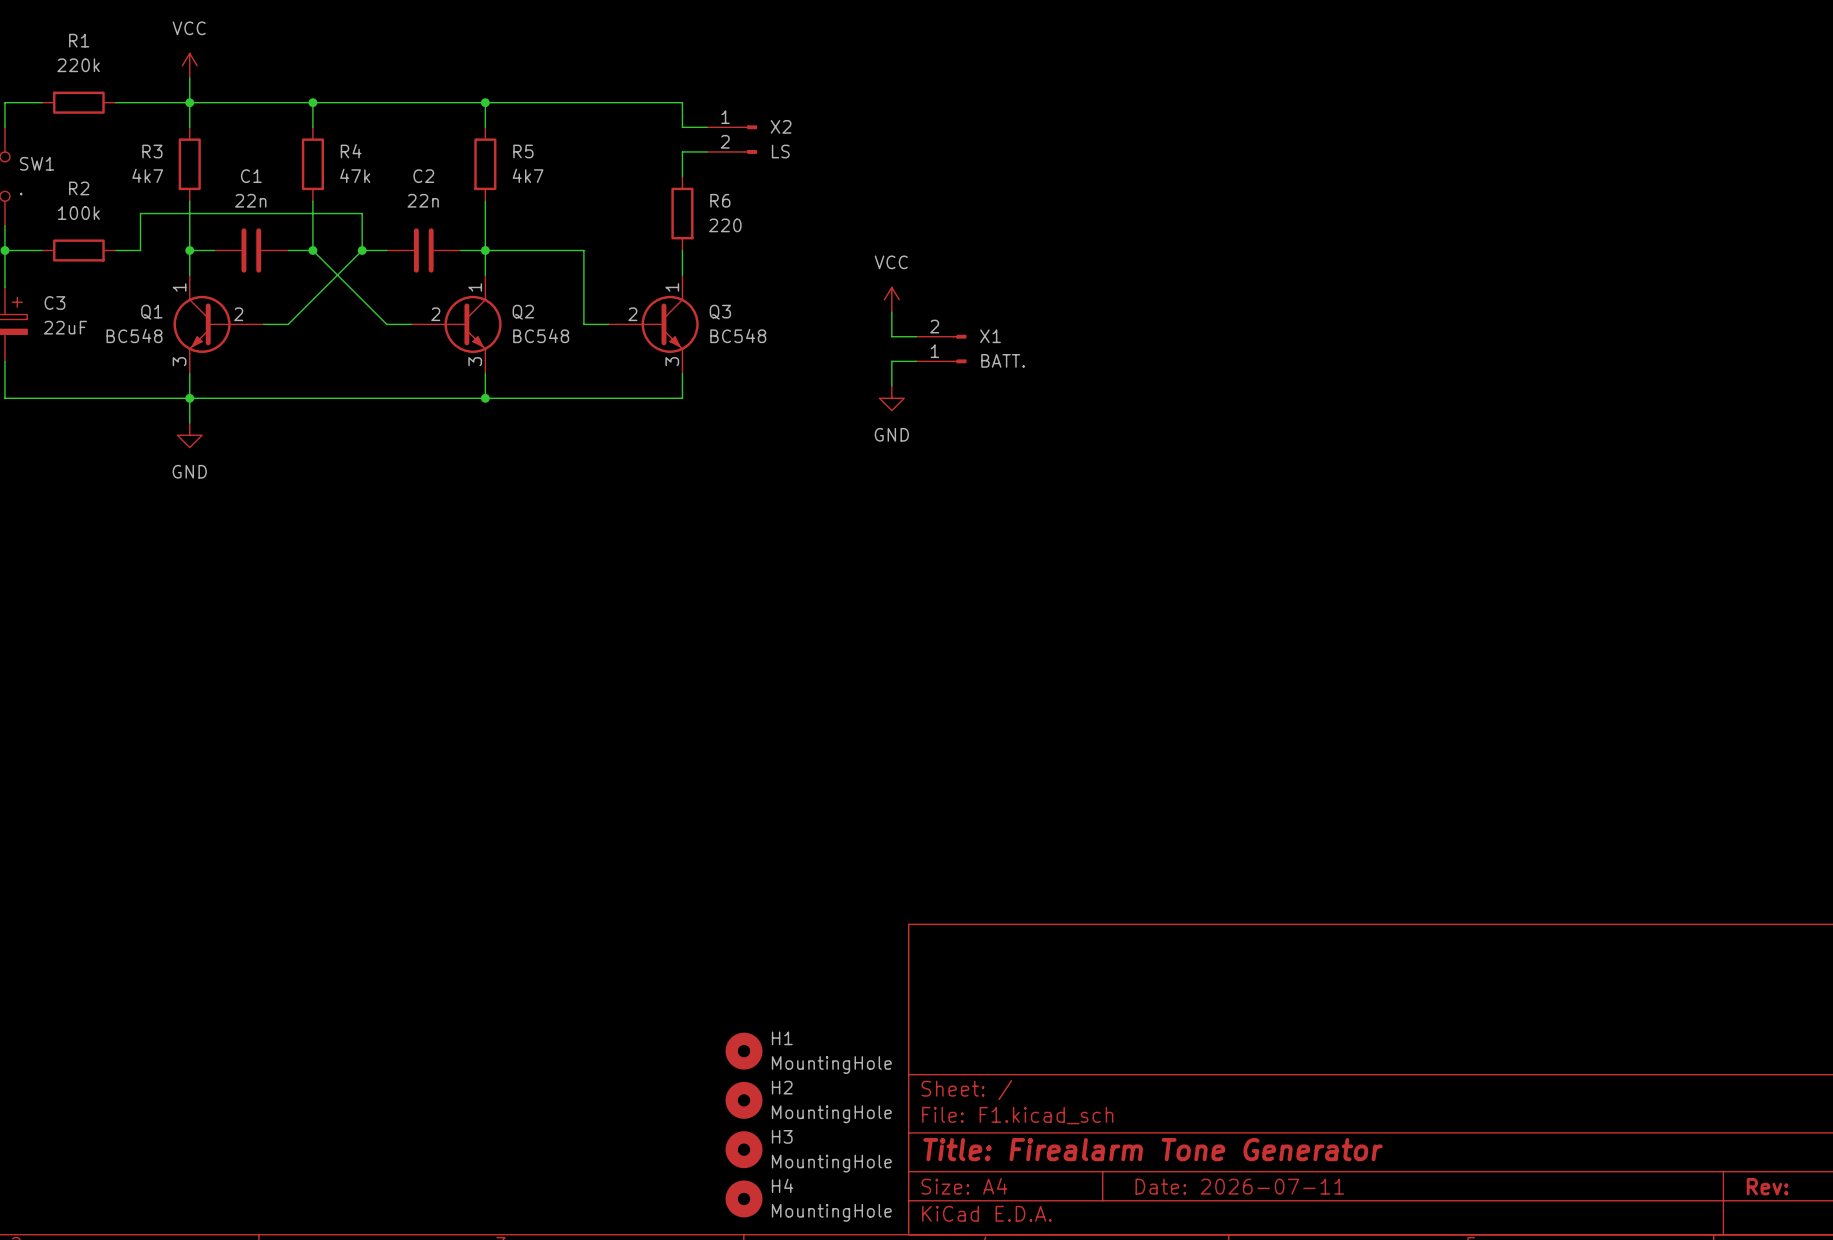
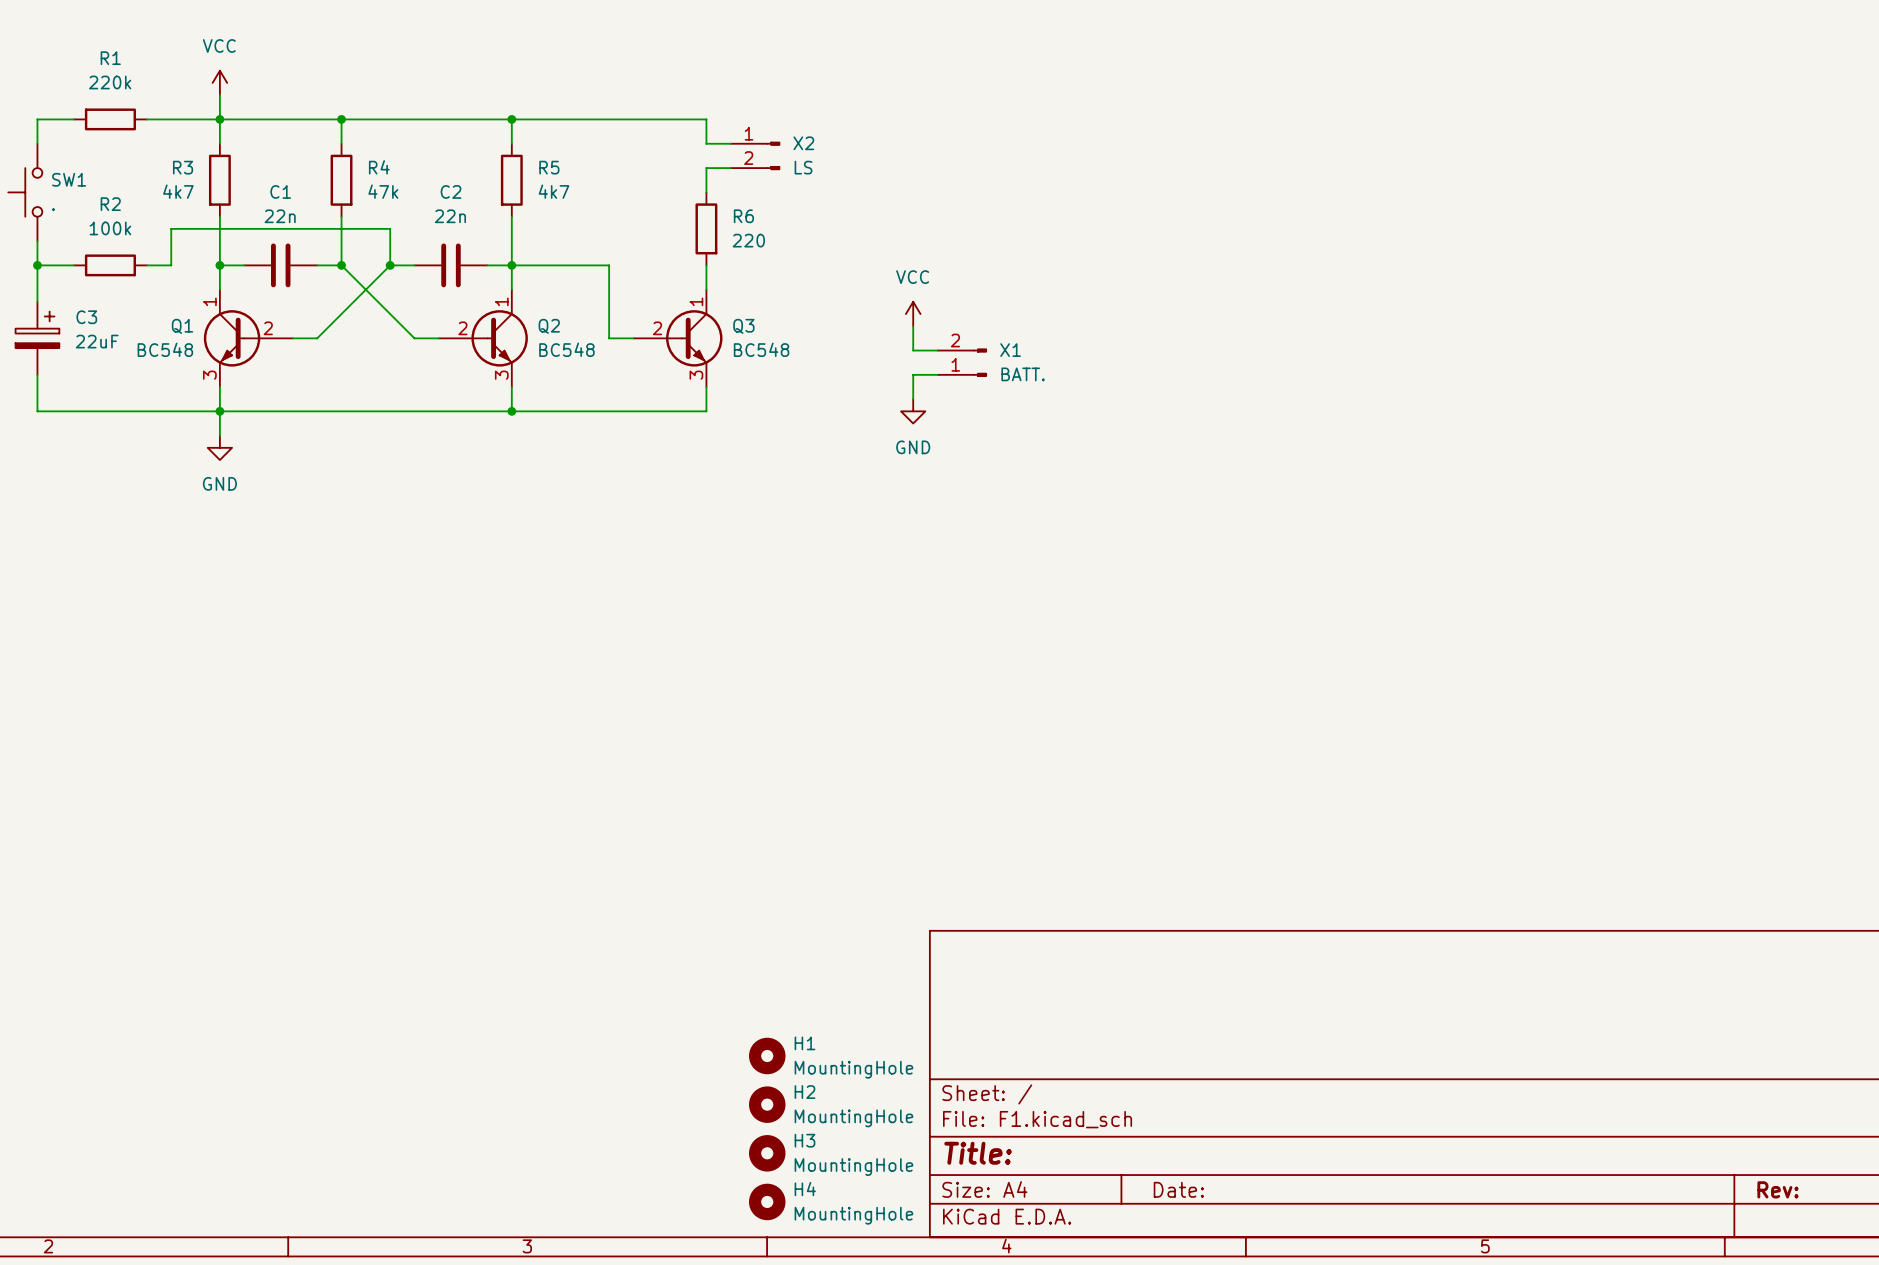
title block: Title: Firealarm Tone Generator (1152, 1149) -> Title: (978, 1153)
title block: Date: 2026-07-11 (1239, 1186) -> Date: (1178, 1189)

